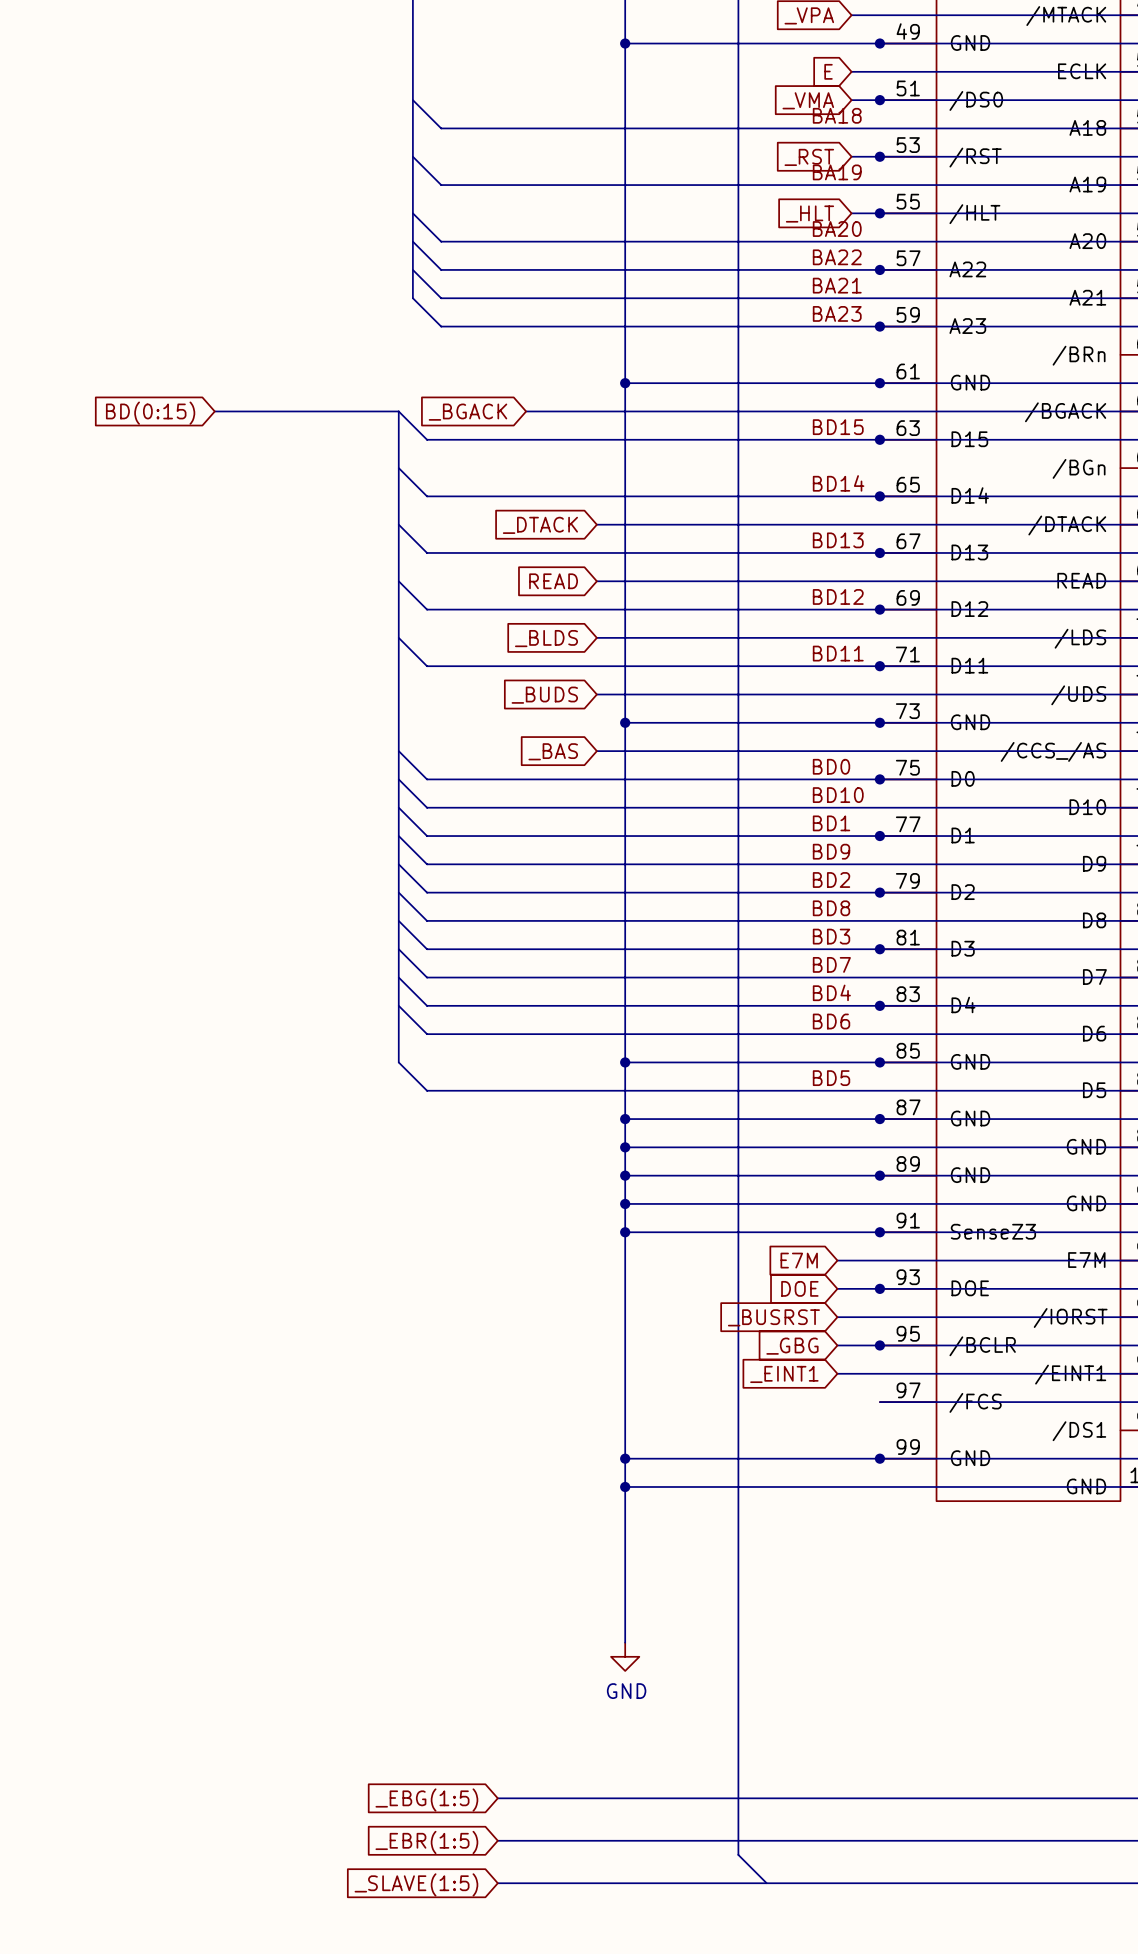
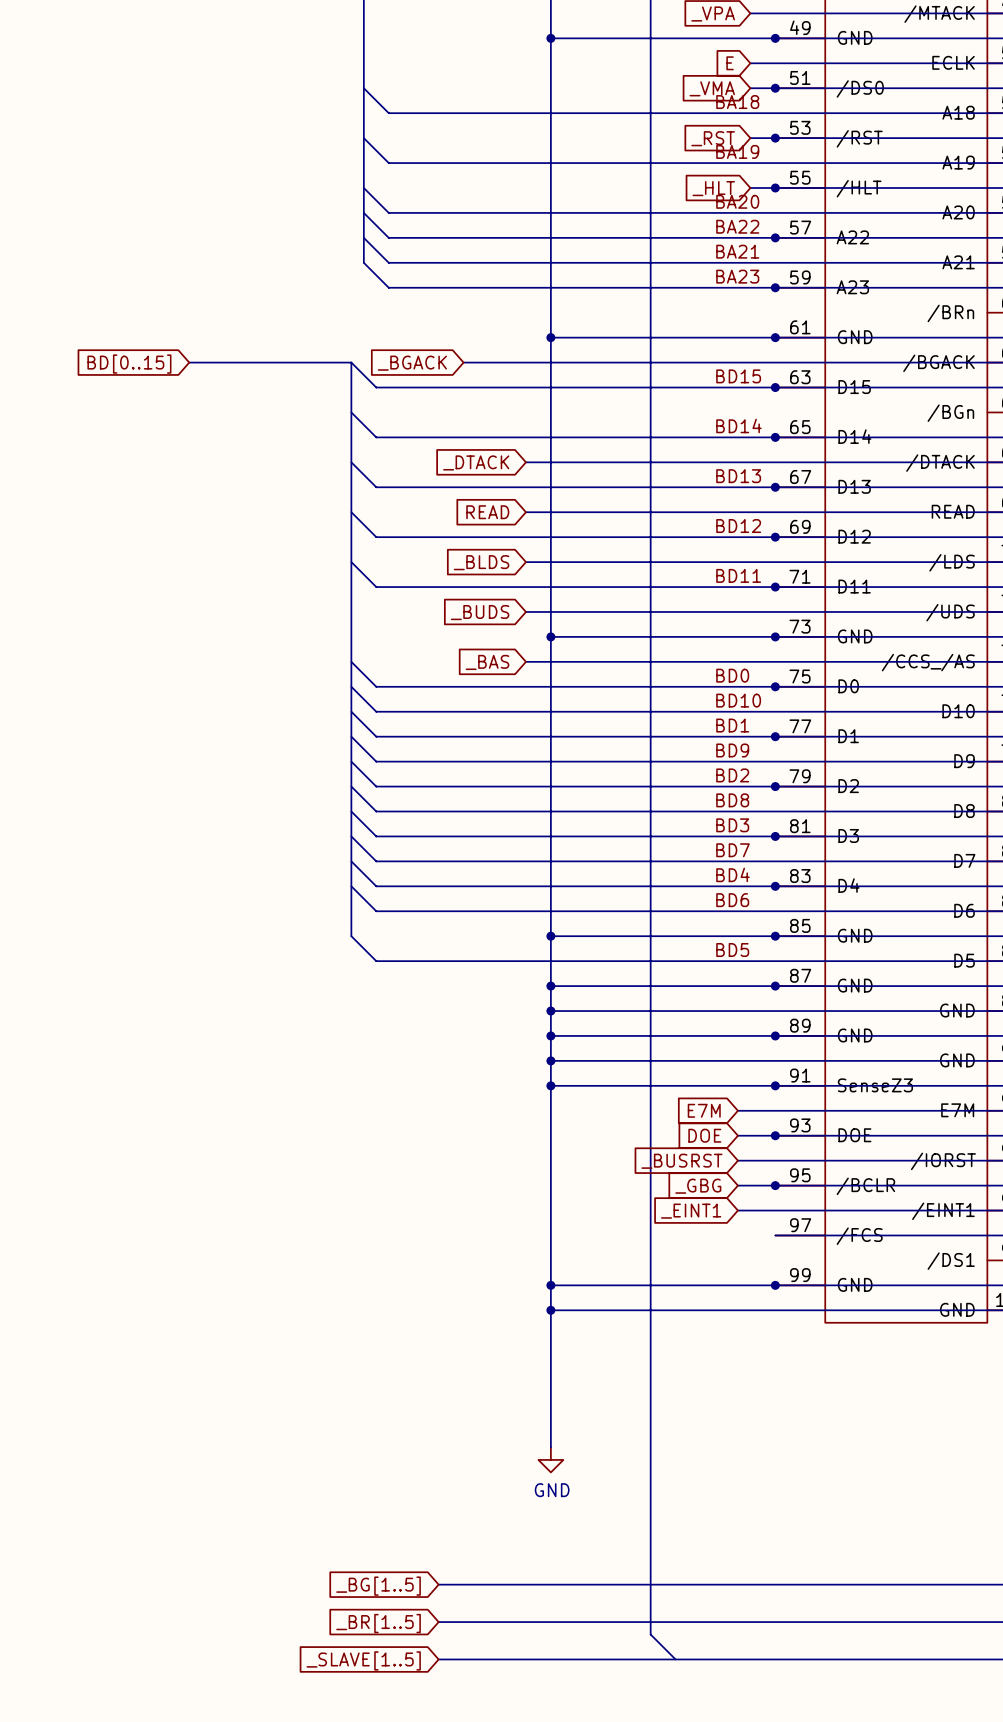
global label: BD(0:15) (150, 413) -> BD[0..15] (129, 364)
global label: _EBG(1:5) (426, 1800) -> _BG[1..5] (378, 1586)
global label: _EBR(1:5) (426, 1842) -> _BR[1..5] (378, 1623)
global label: _SLAVE(1:5) (416, 1884) -> _SLAVE[1..5] (363, 1660)

